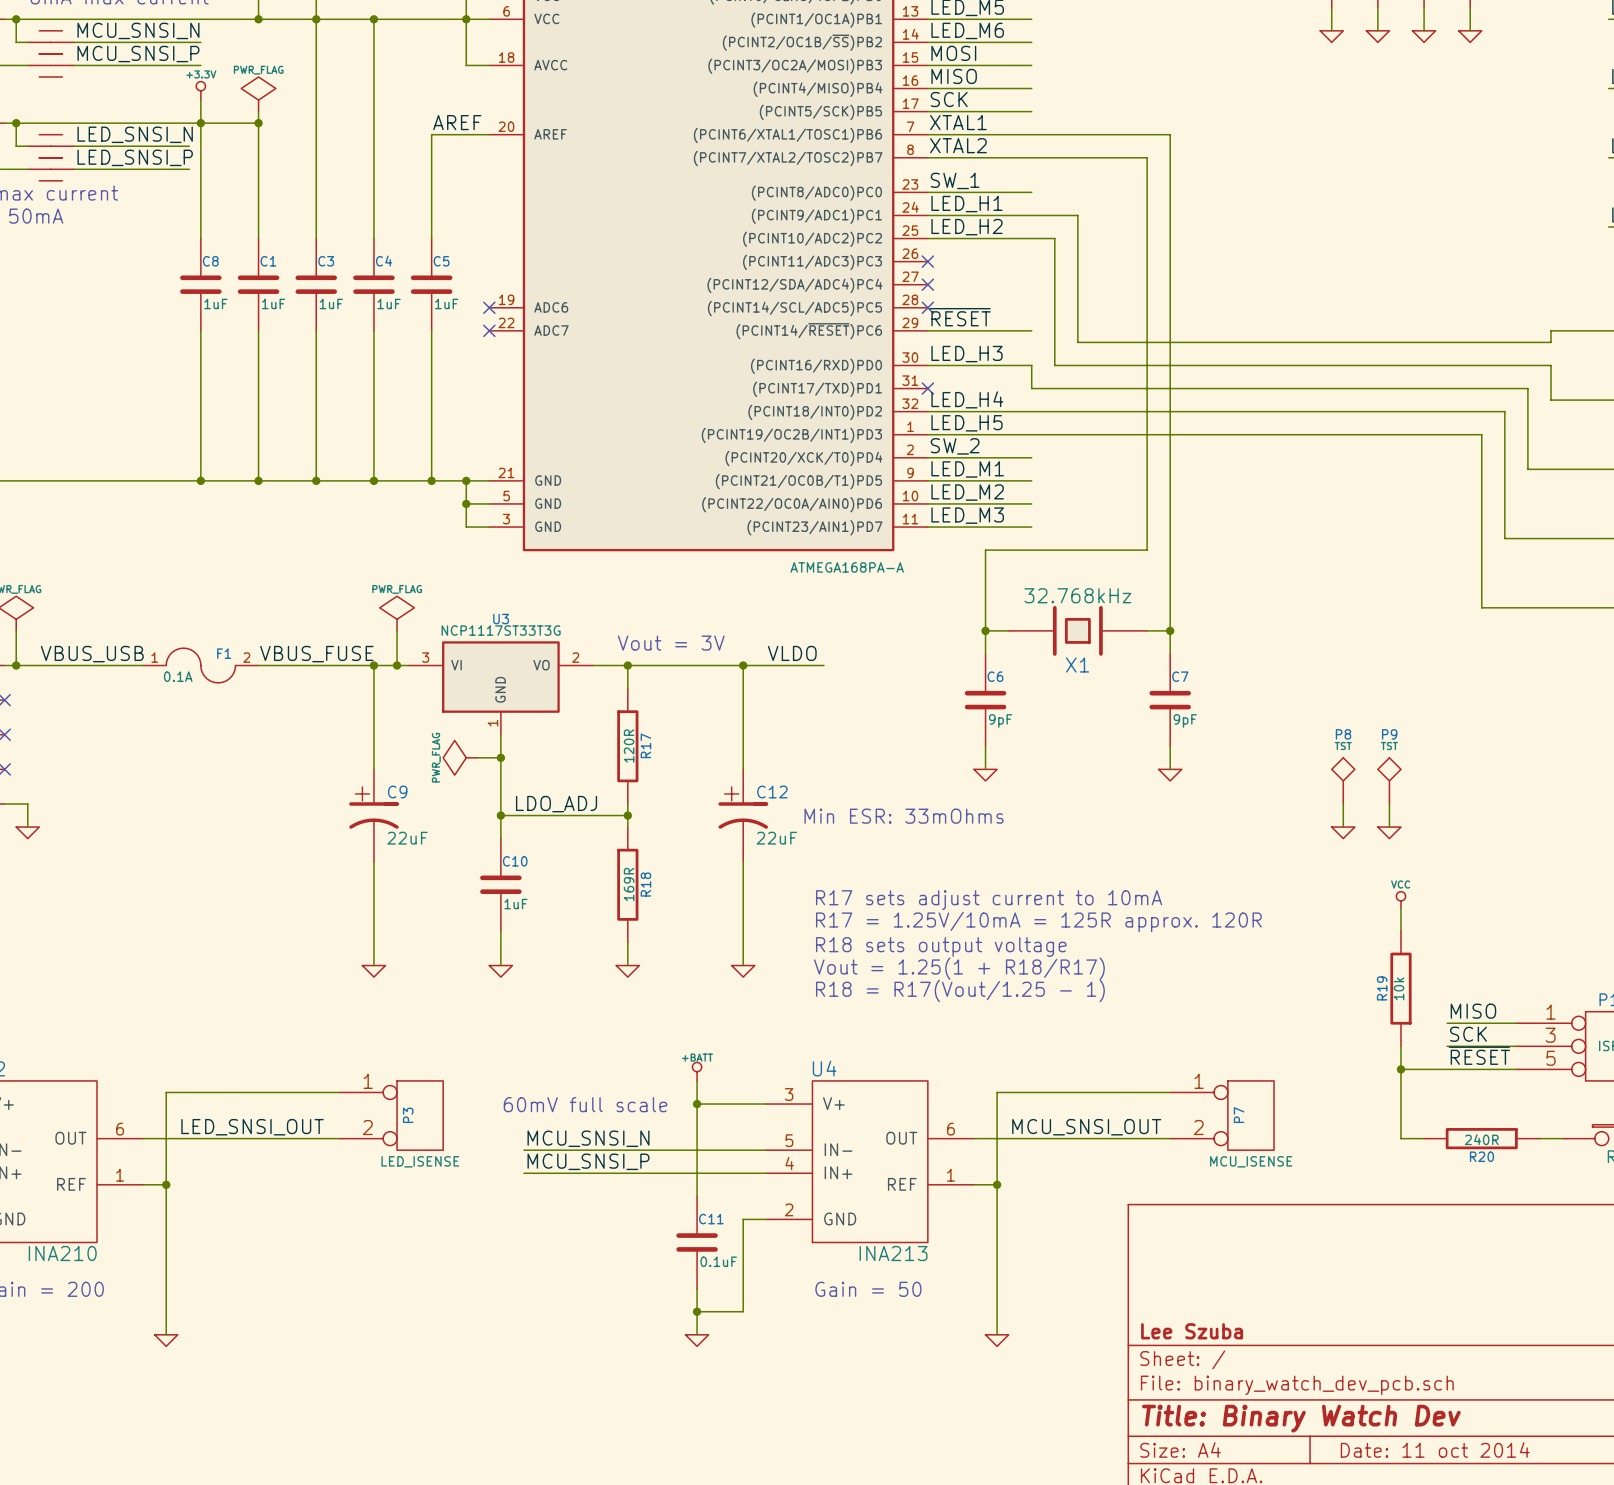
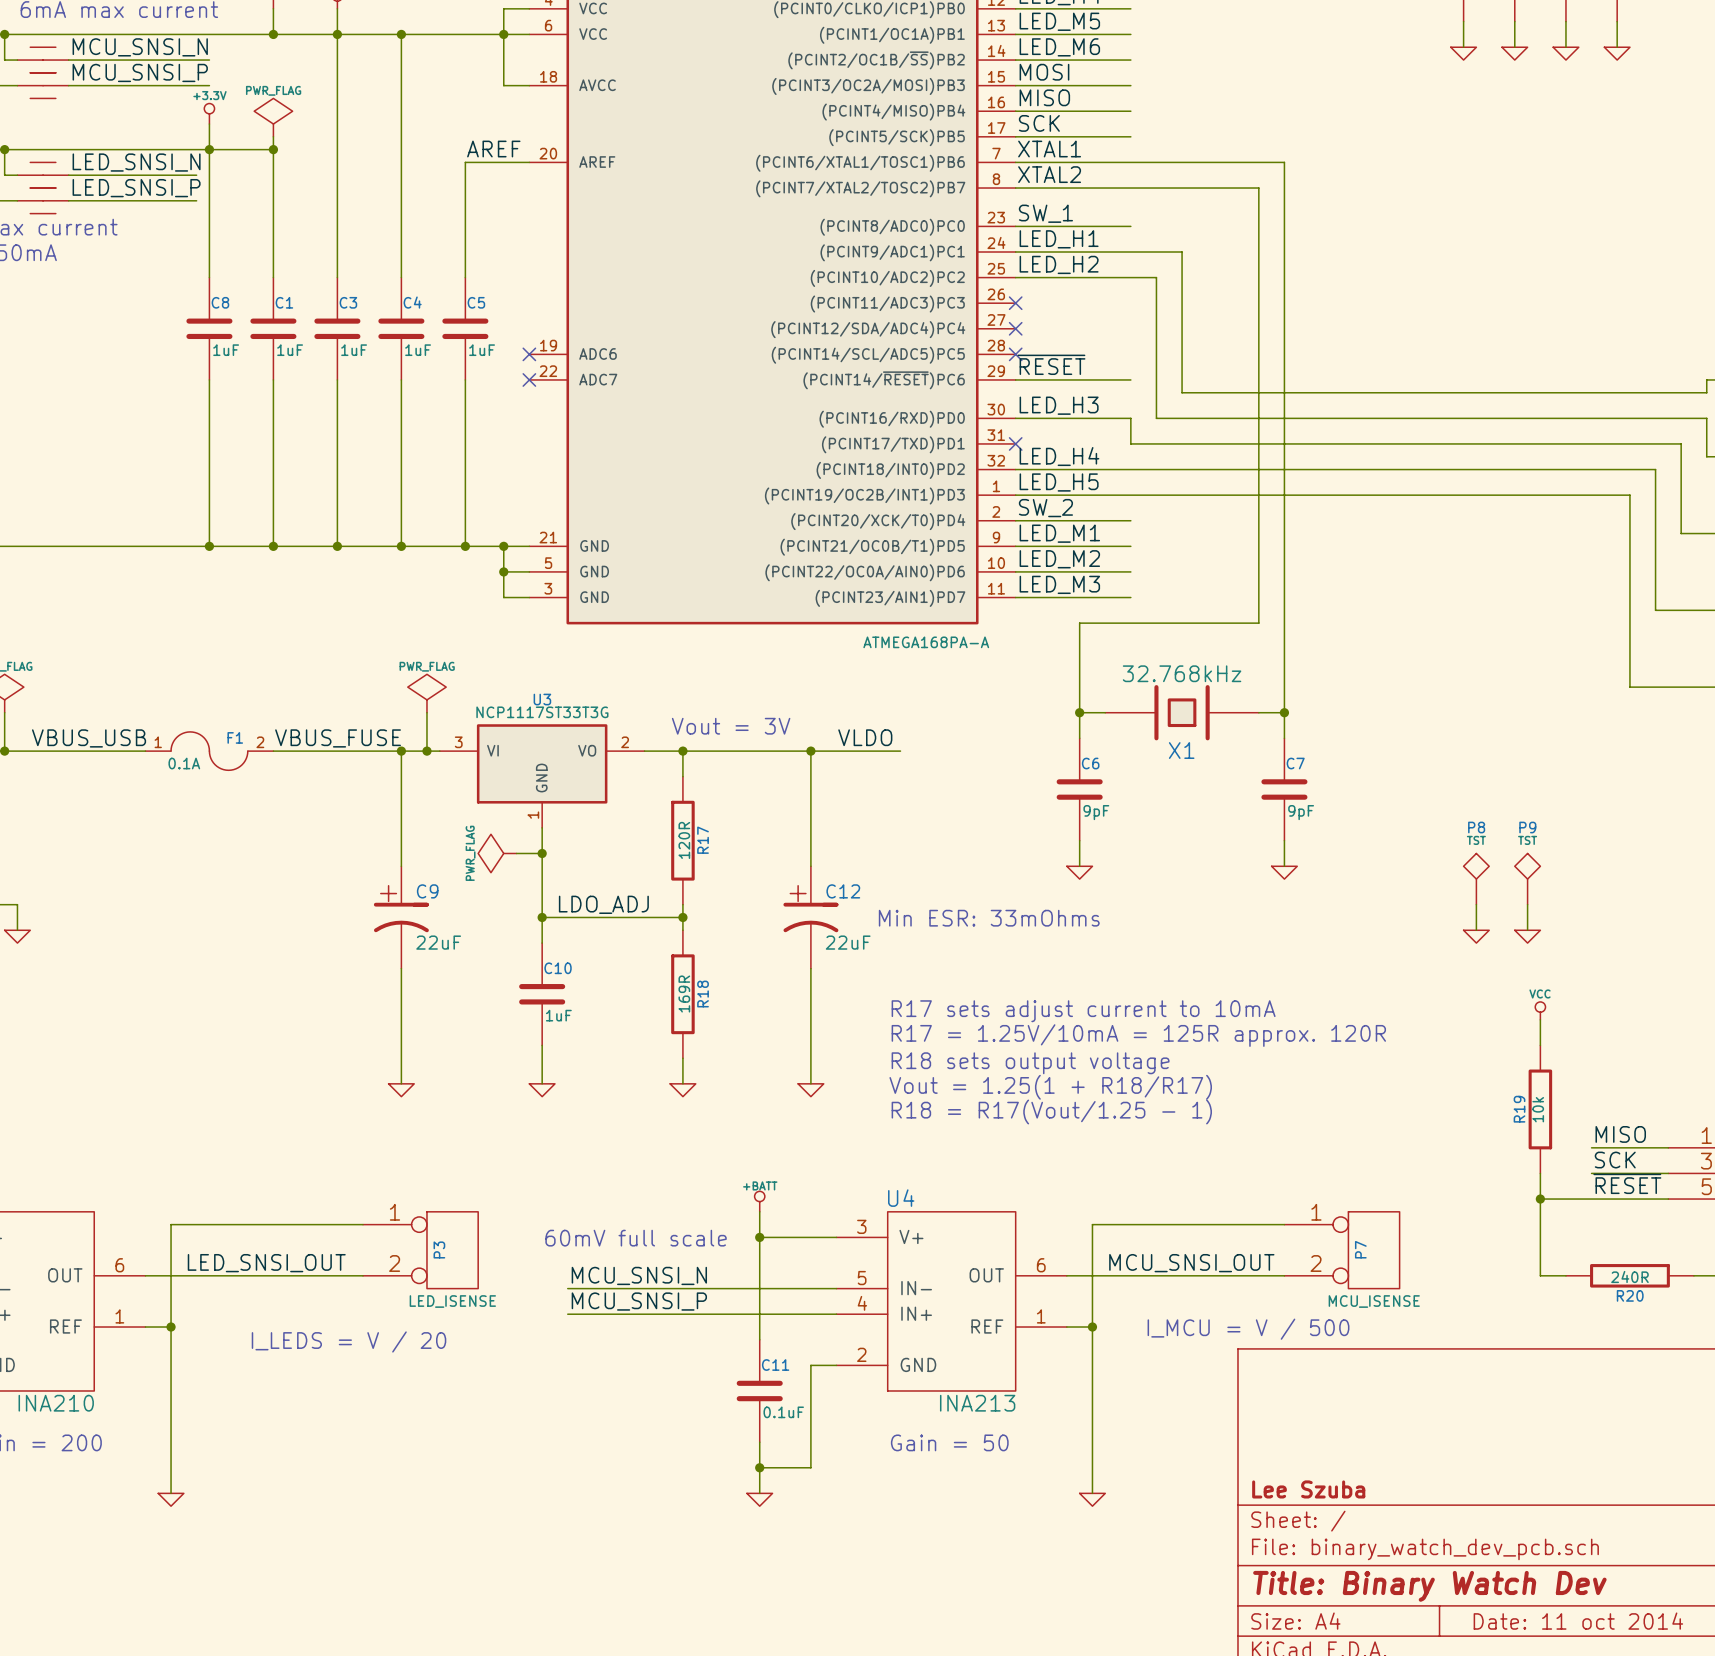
text: none -> I_MCU = V / 500 (1248, 1329)
text: none -> I_LEDS = V / 20 (349, 1341)

